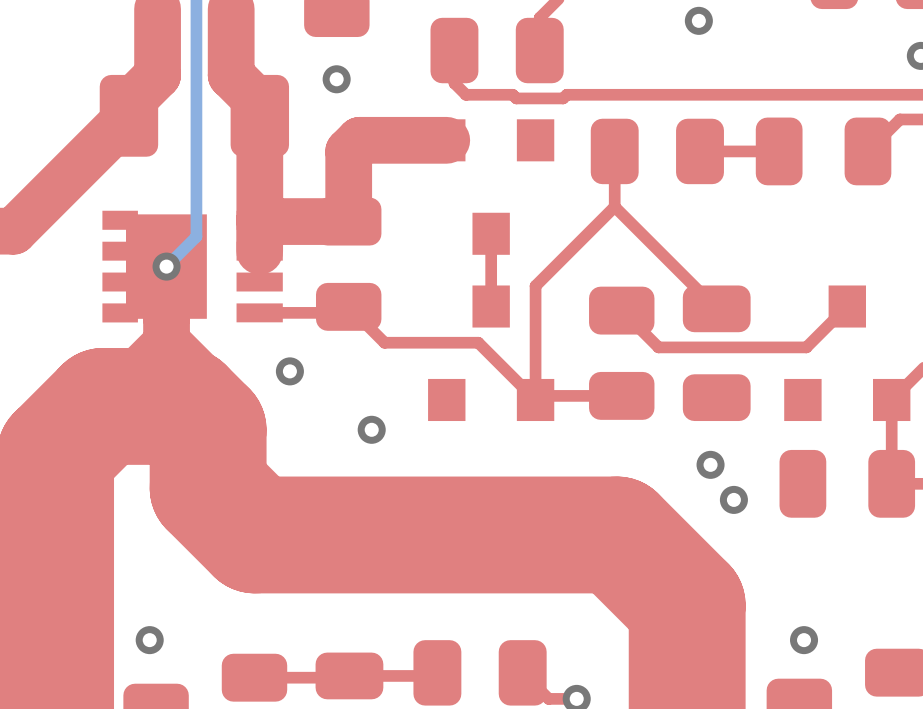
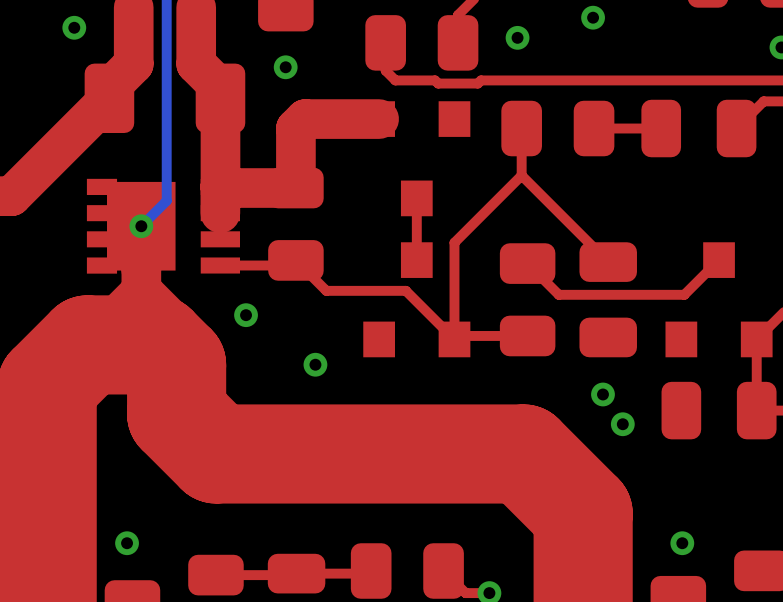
via: none -> (74, 27)
via: none -> (517, 37)

